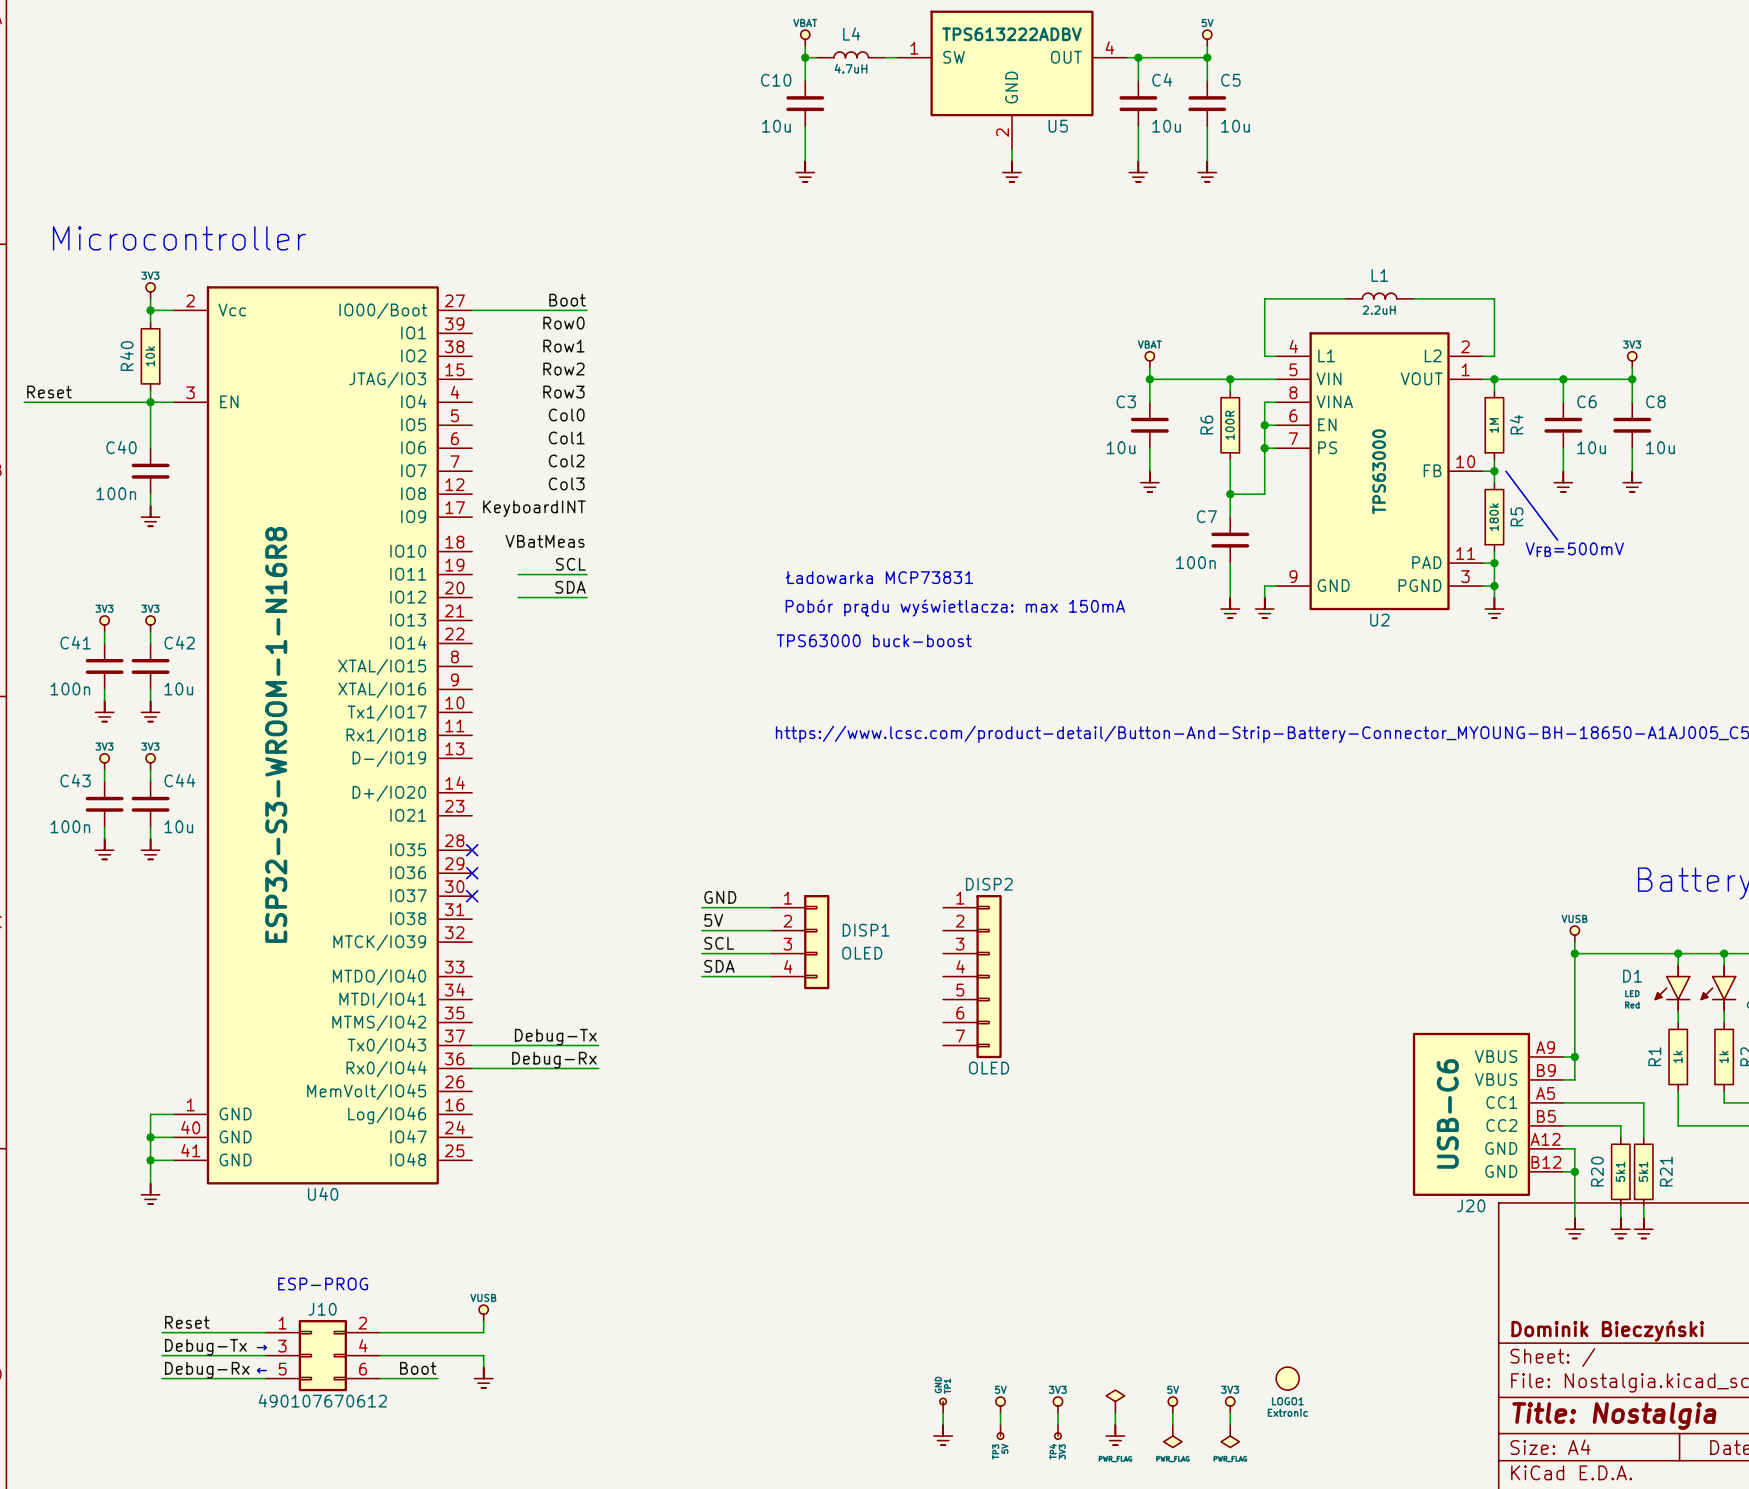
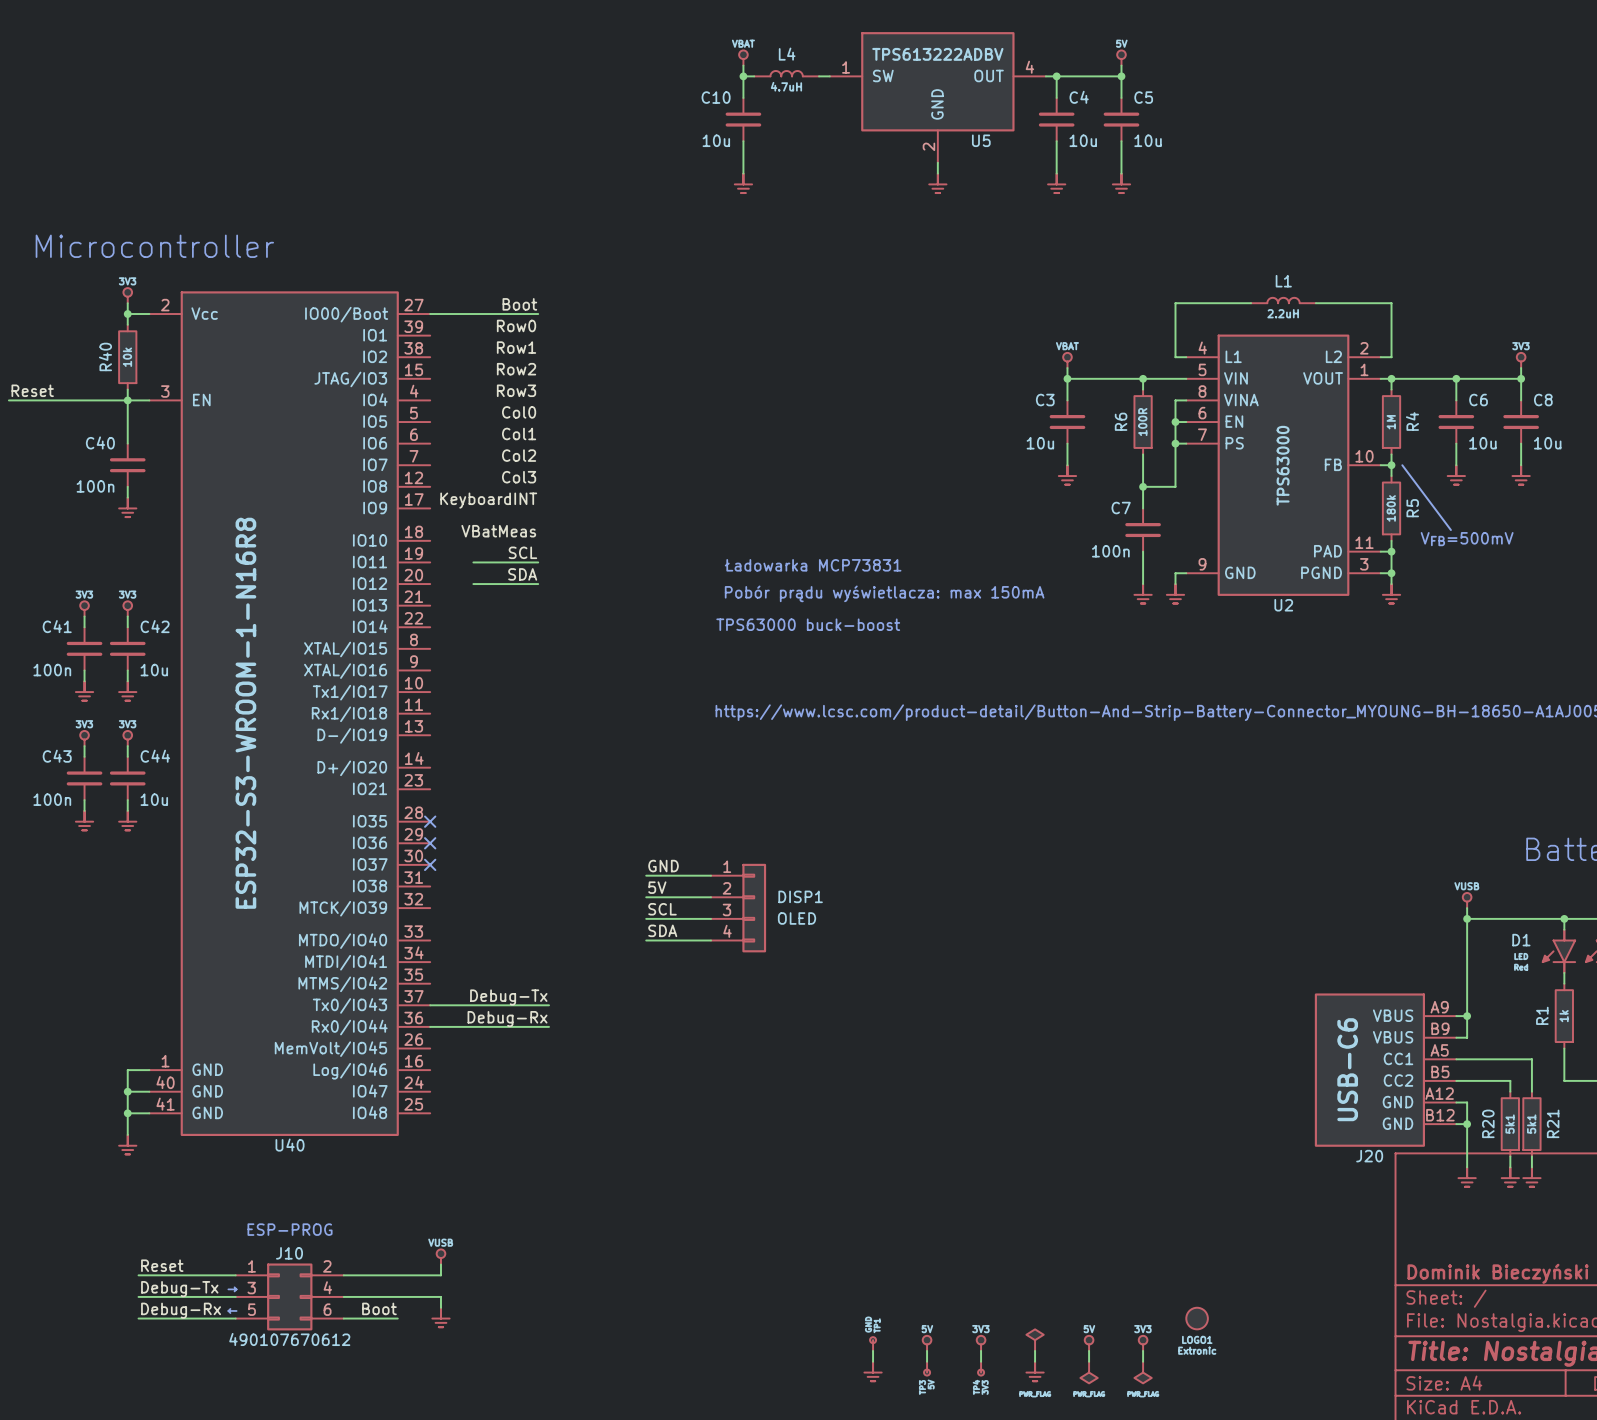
DISP2: OLED (972, 976) -> none

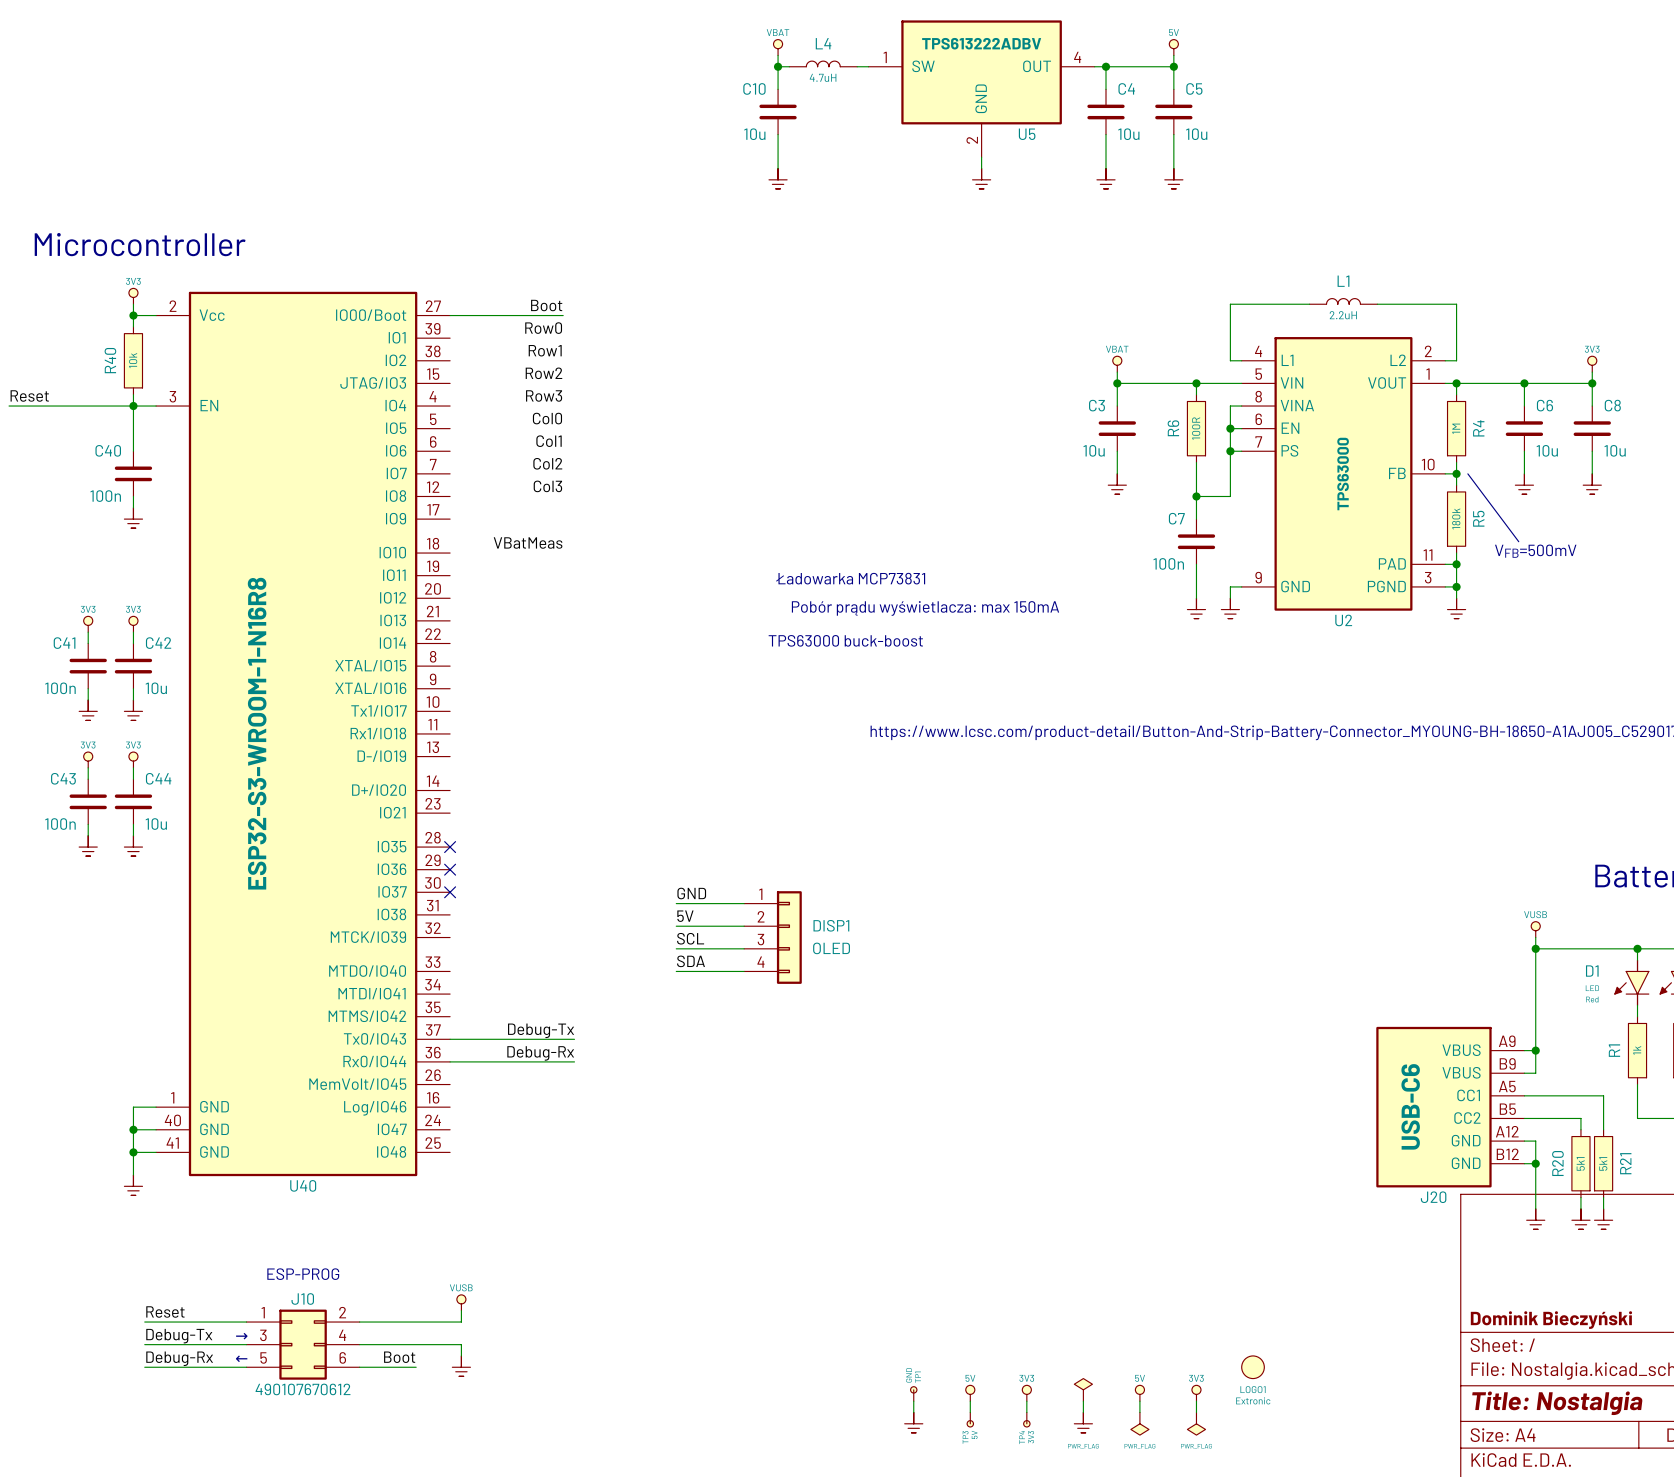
label: KeyboardINT (488, 500) -> none
label: SCL (522, 552) -> none
wire: (473, 562) (538, 562) -> none
label: SDA (522, 574) -> none
wire: (473, 584) (538, 584) -> none

